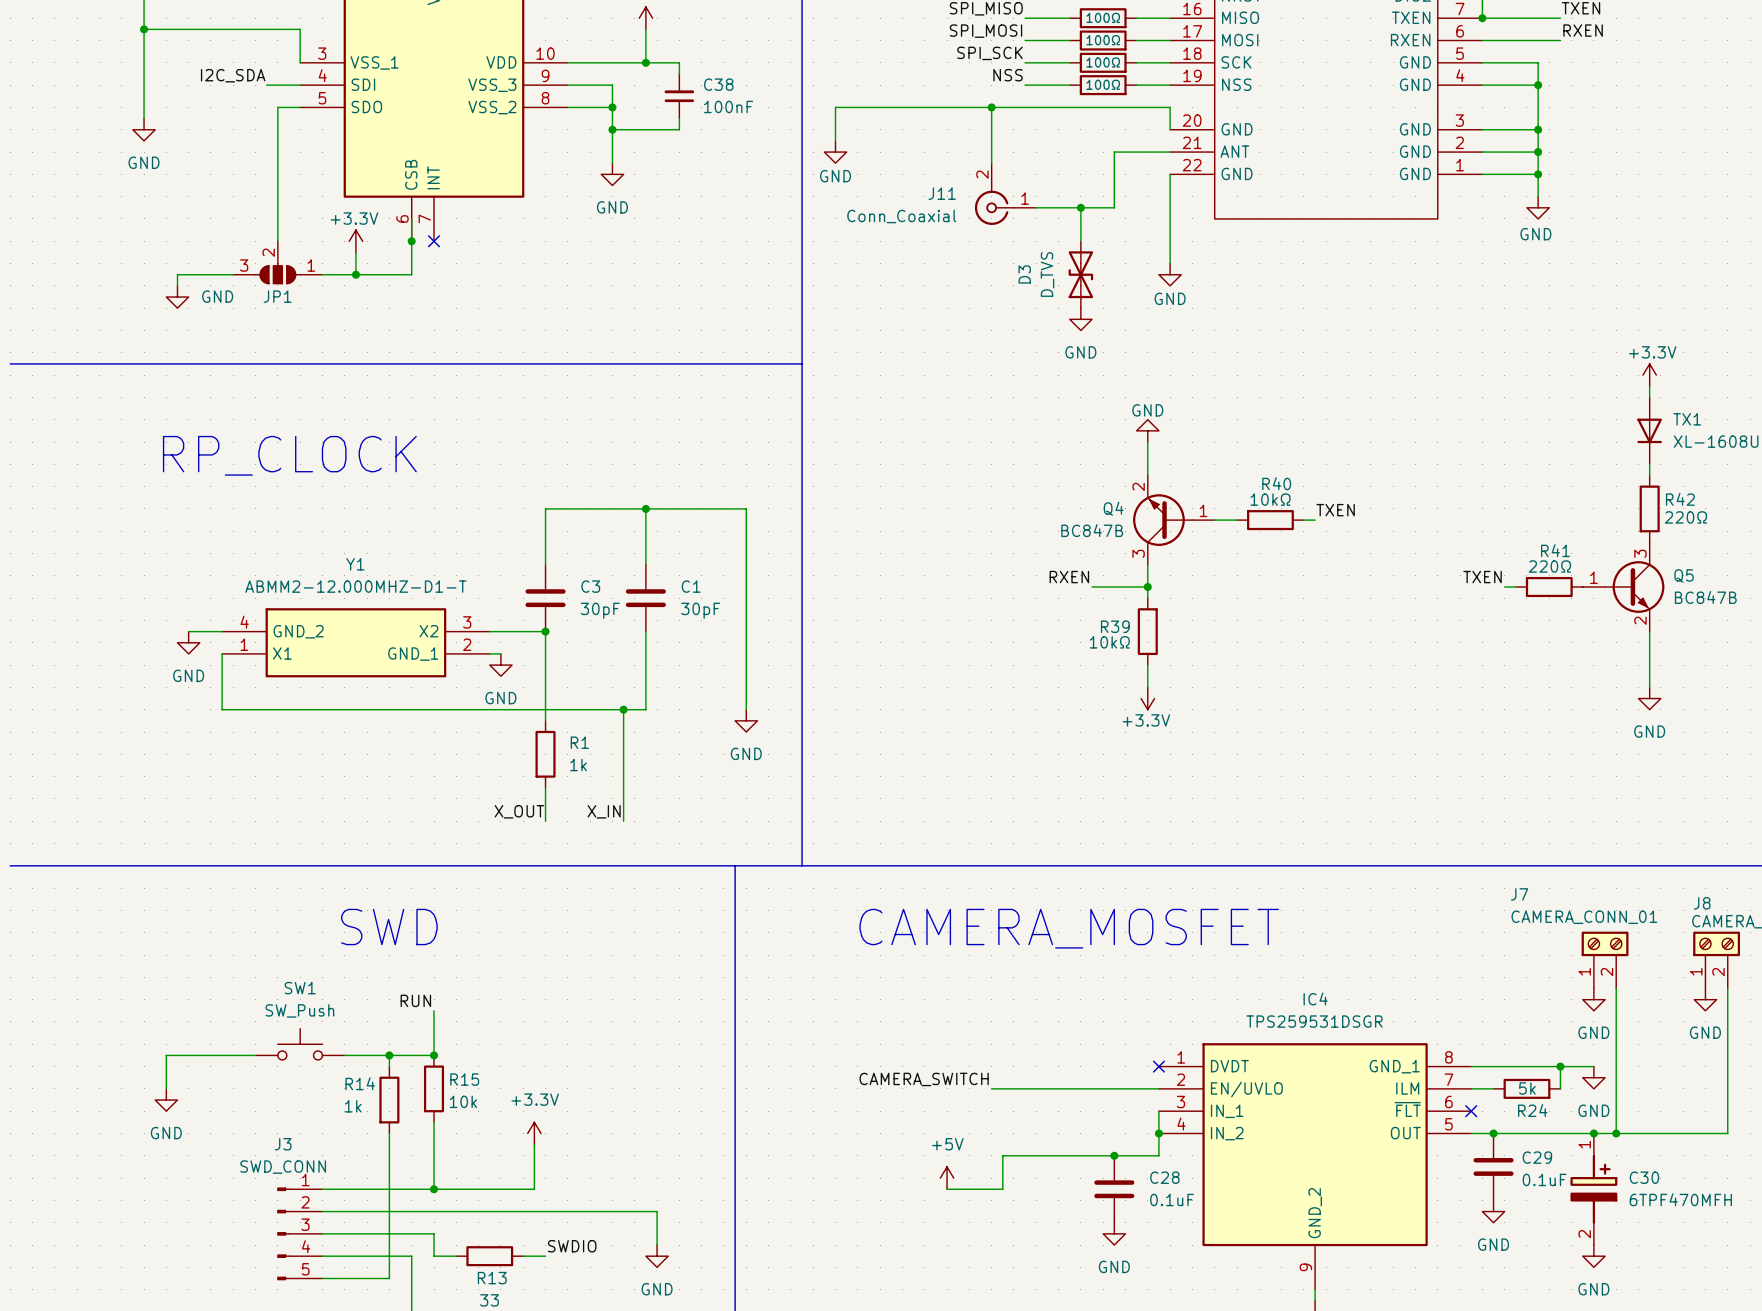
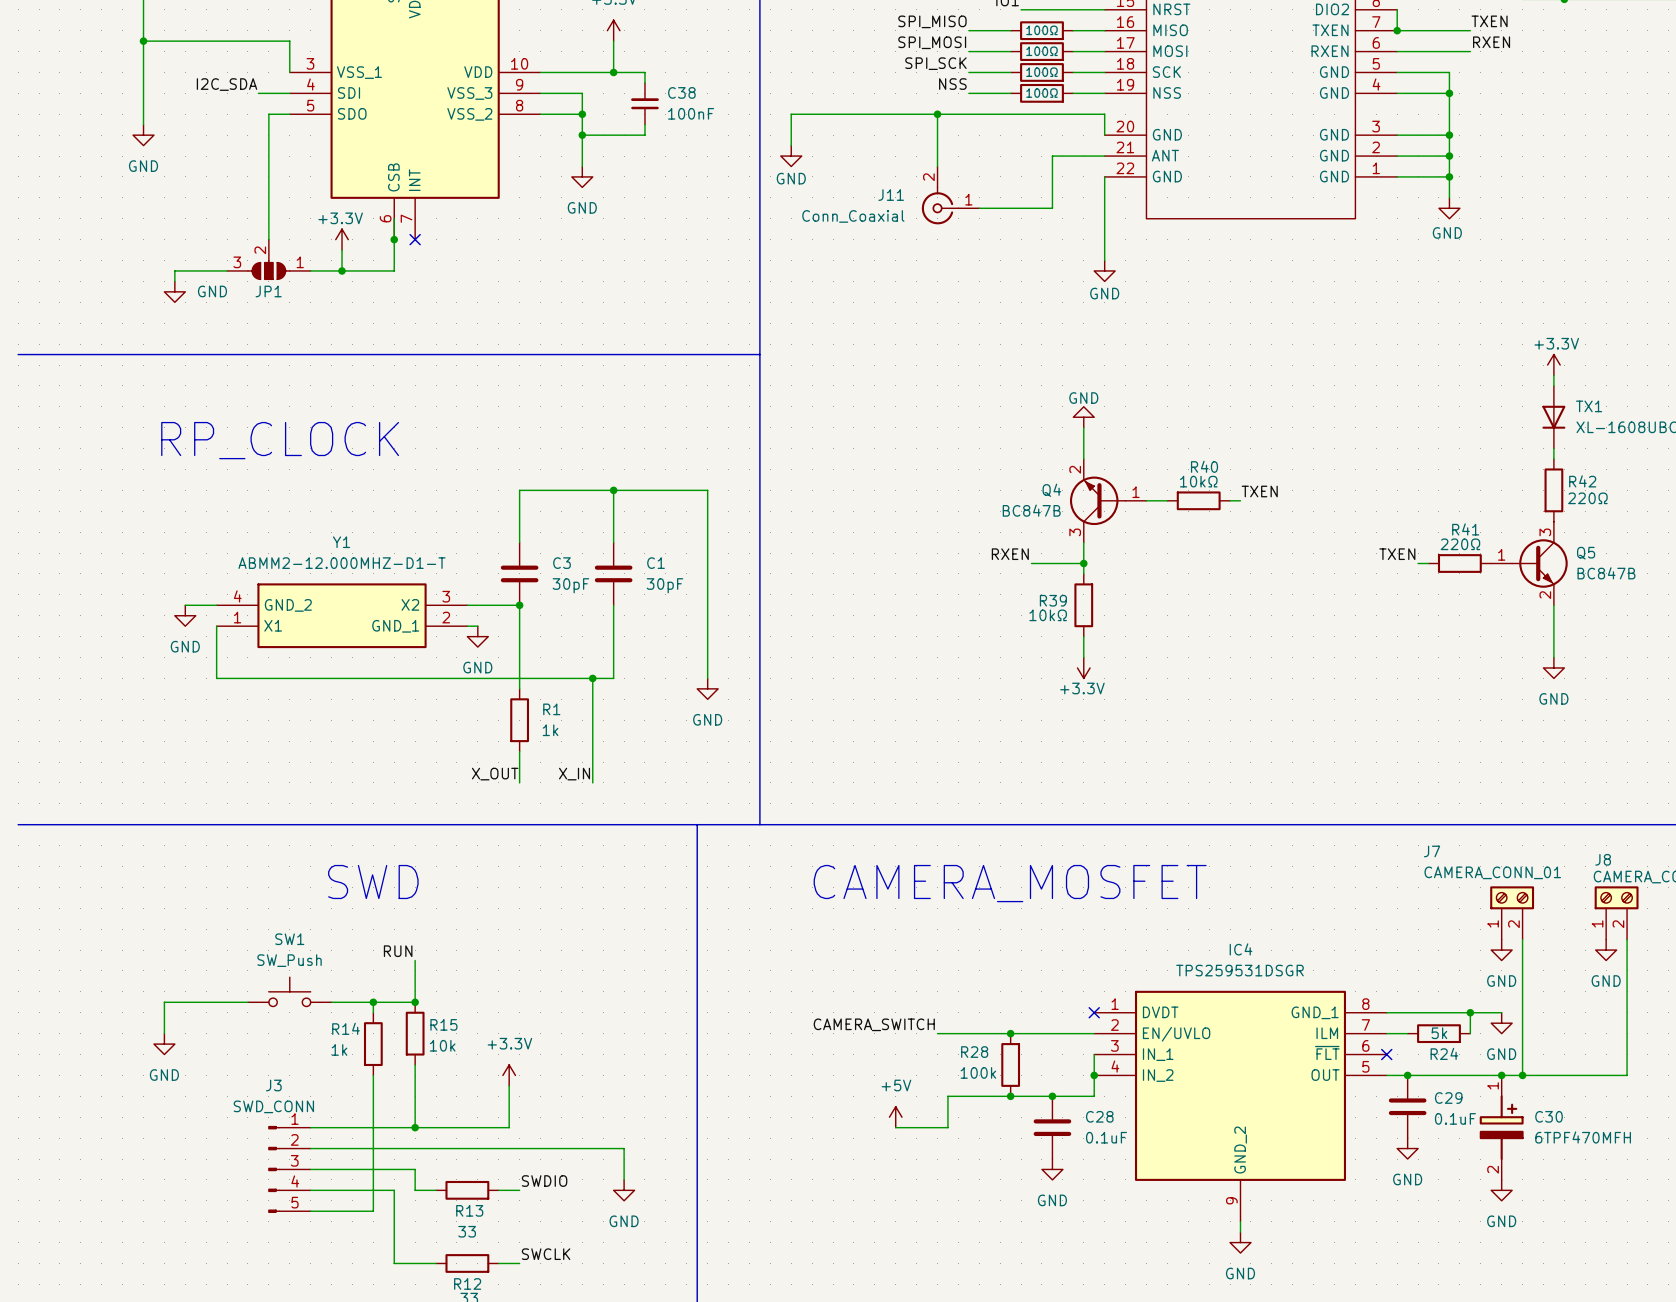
wire: (1080, 207) (1080, 241) -> none
junction: (1080, 207) -> none
D3: D_TVS (1080, 274) -> none
power symbol: GND (1080, 319) -> none
junction: none -> (1010, 1033)
R28: none -> 100k (1010, 1064)
junction: none -> (1010, 1096)

